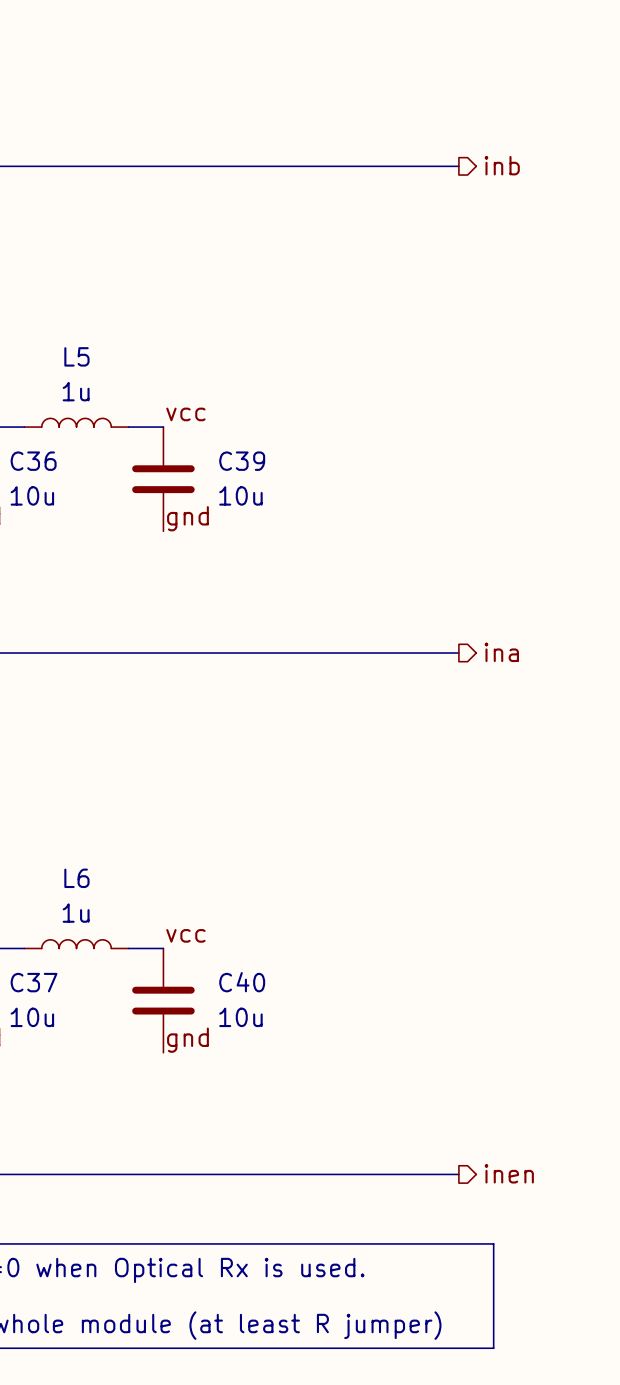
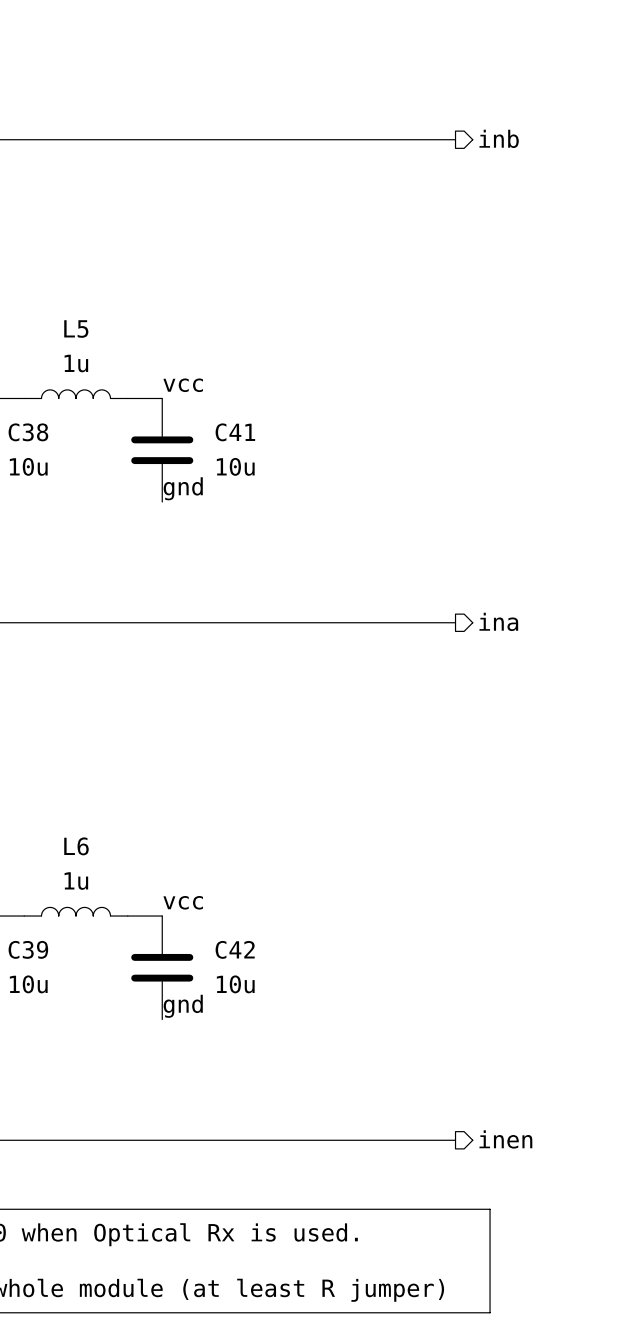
C36 name: C36 (33, 461) -> C38 (28, 432)
C39 name: C39 (242, 461) -> C41 (235, 432)
C37 name: C37 (34, 982) -> C39 (28, 949)
C40 name: C40 (242, 982) -> C42 (235, 949)

